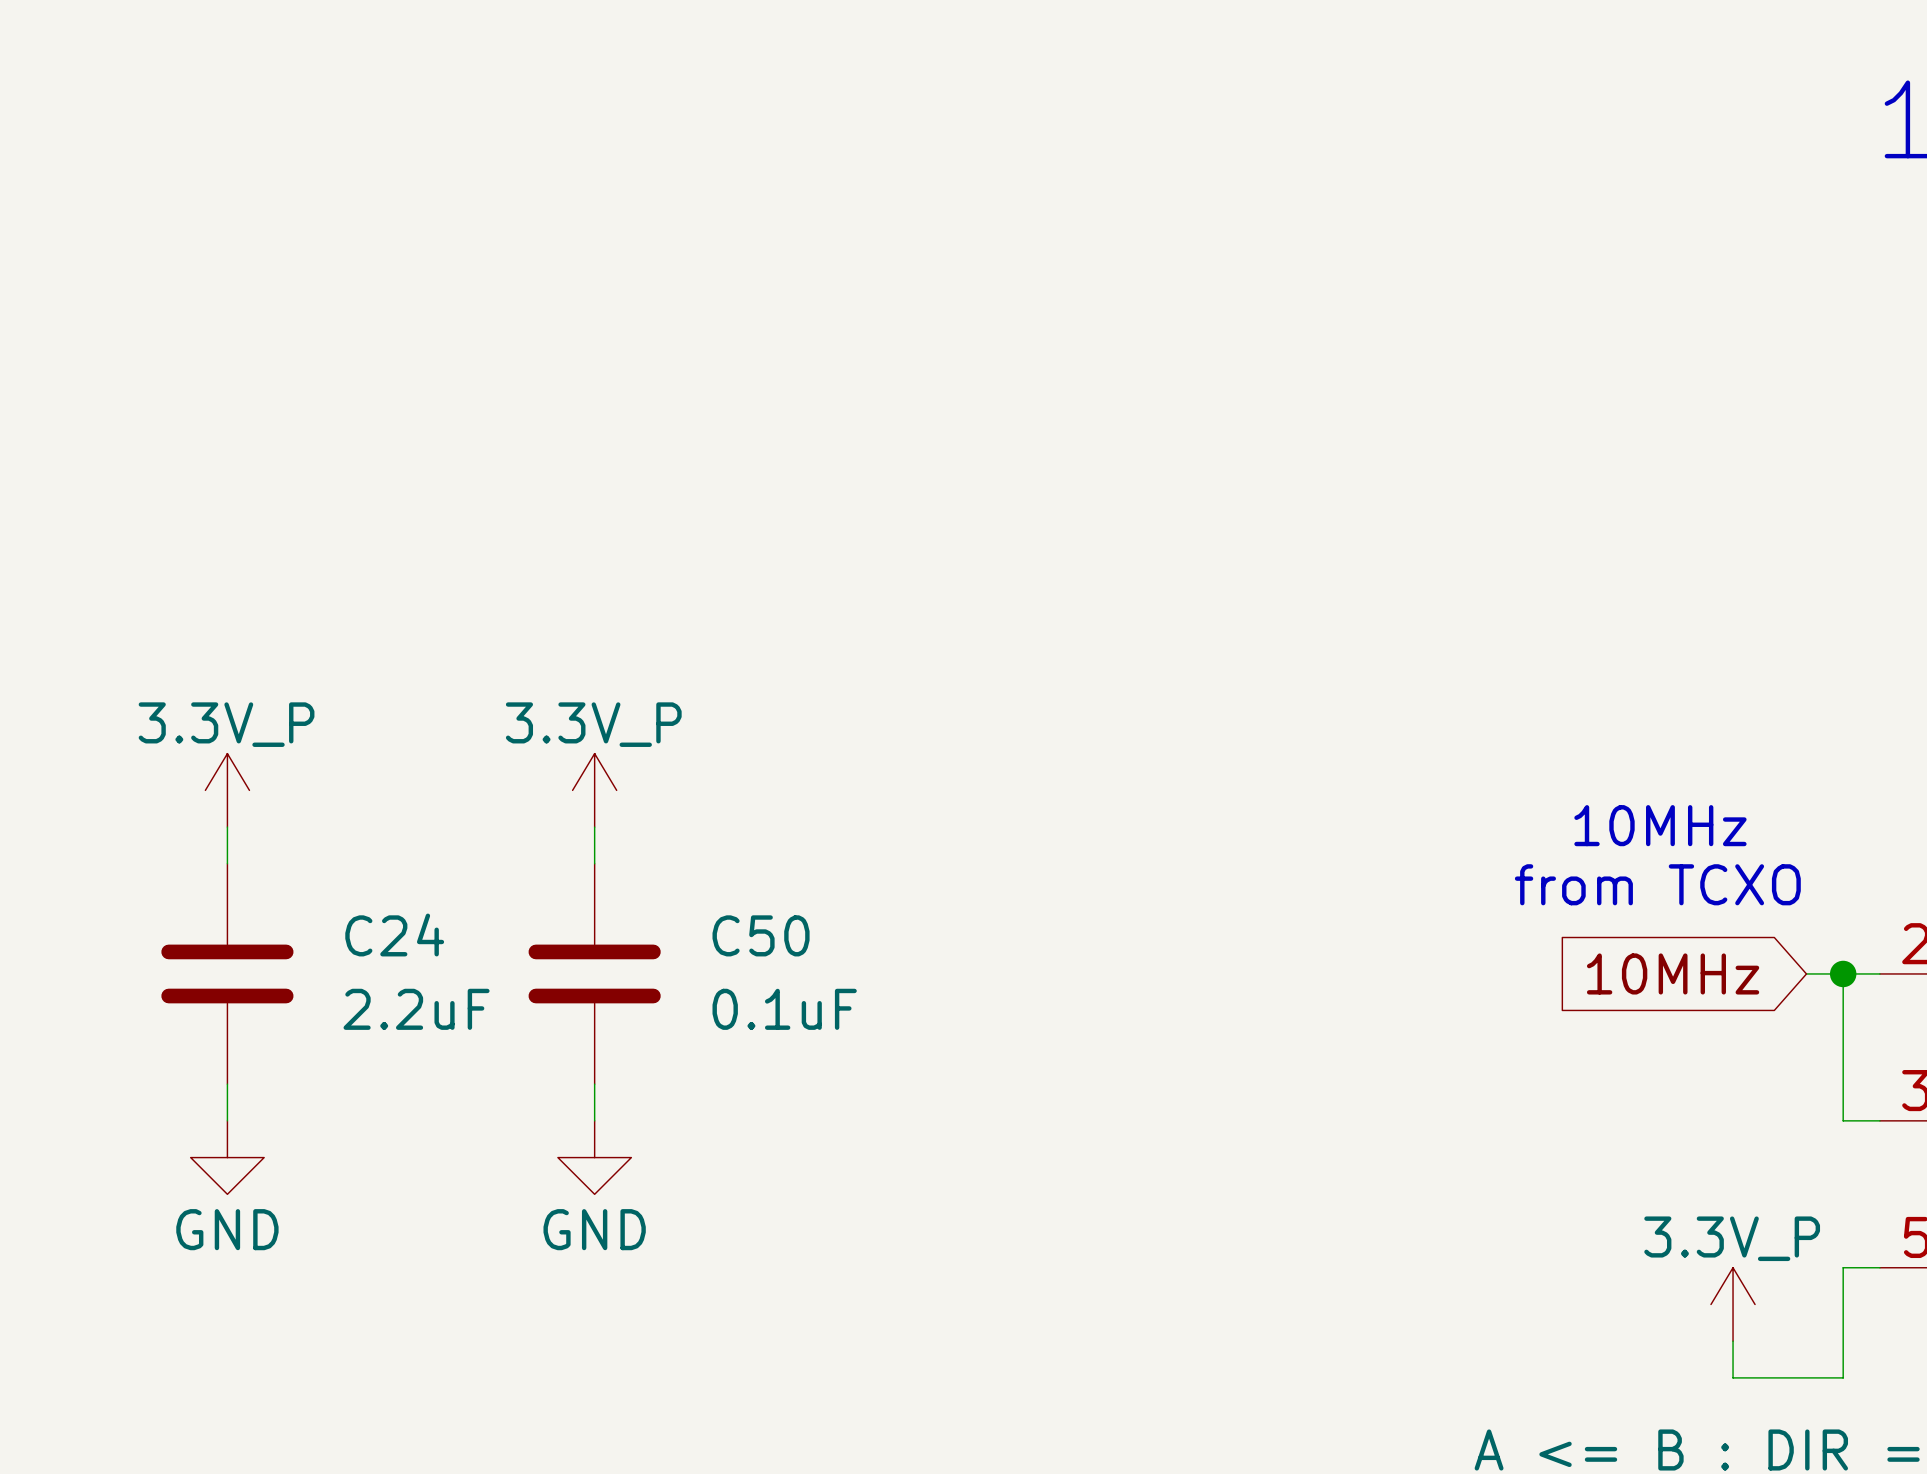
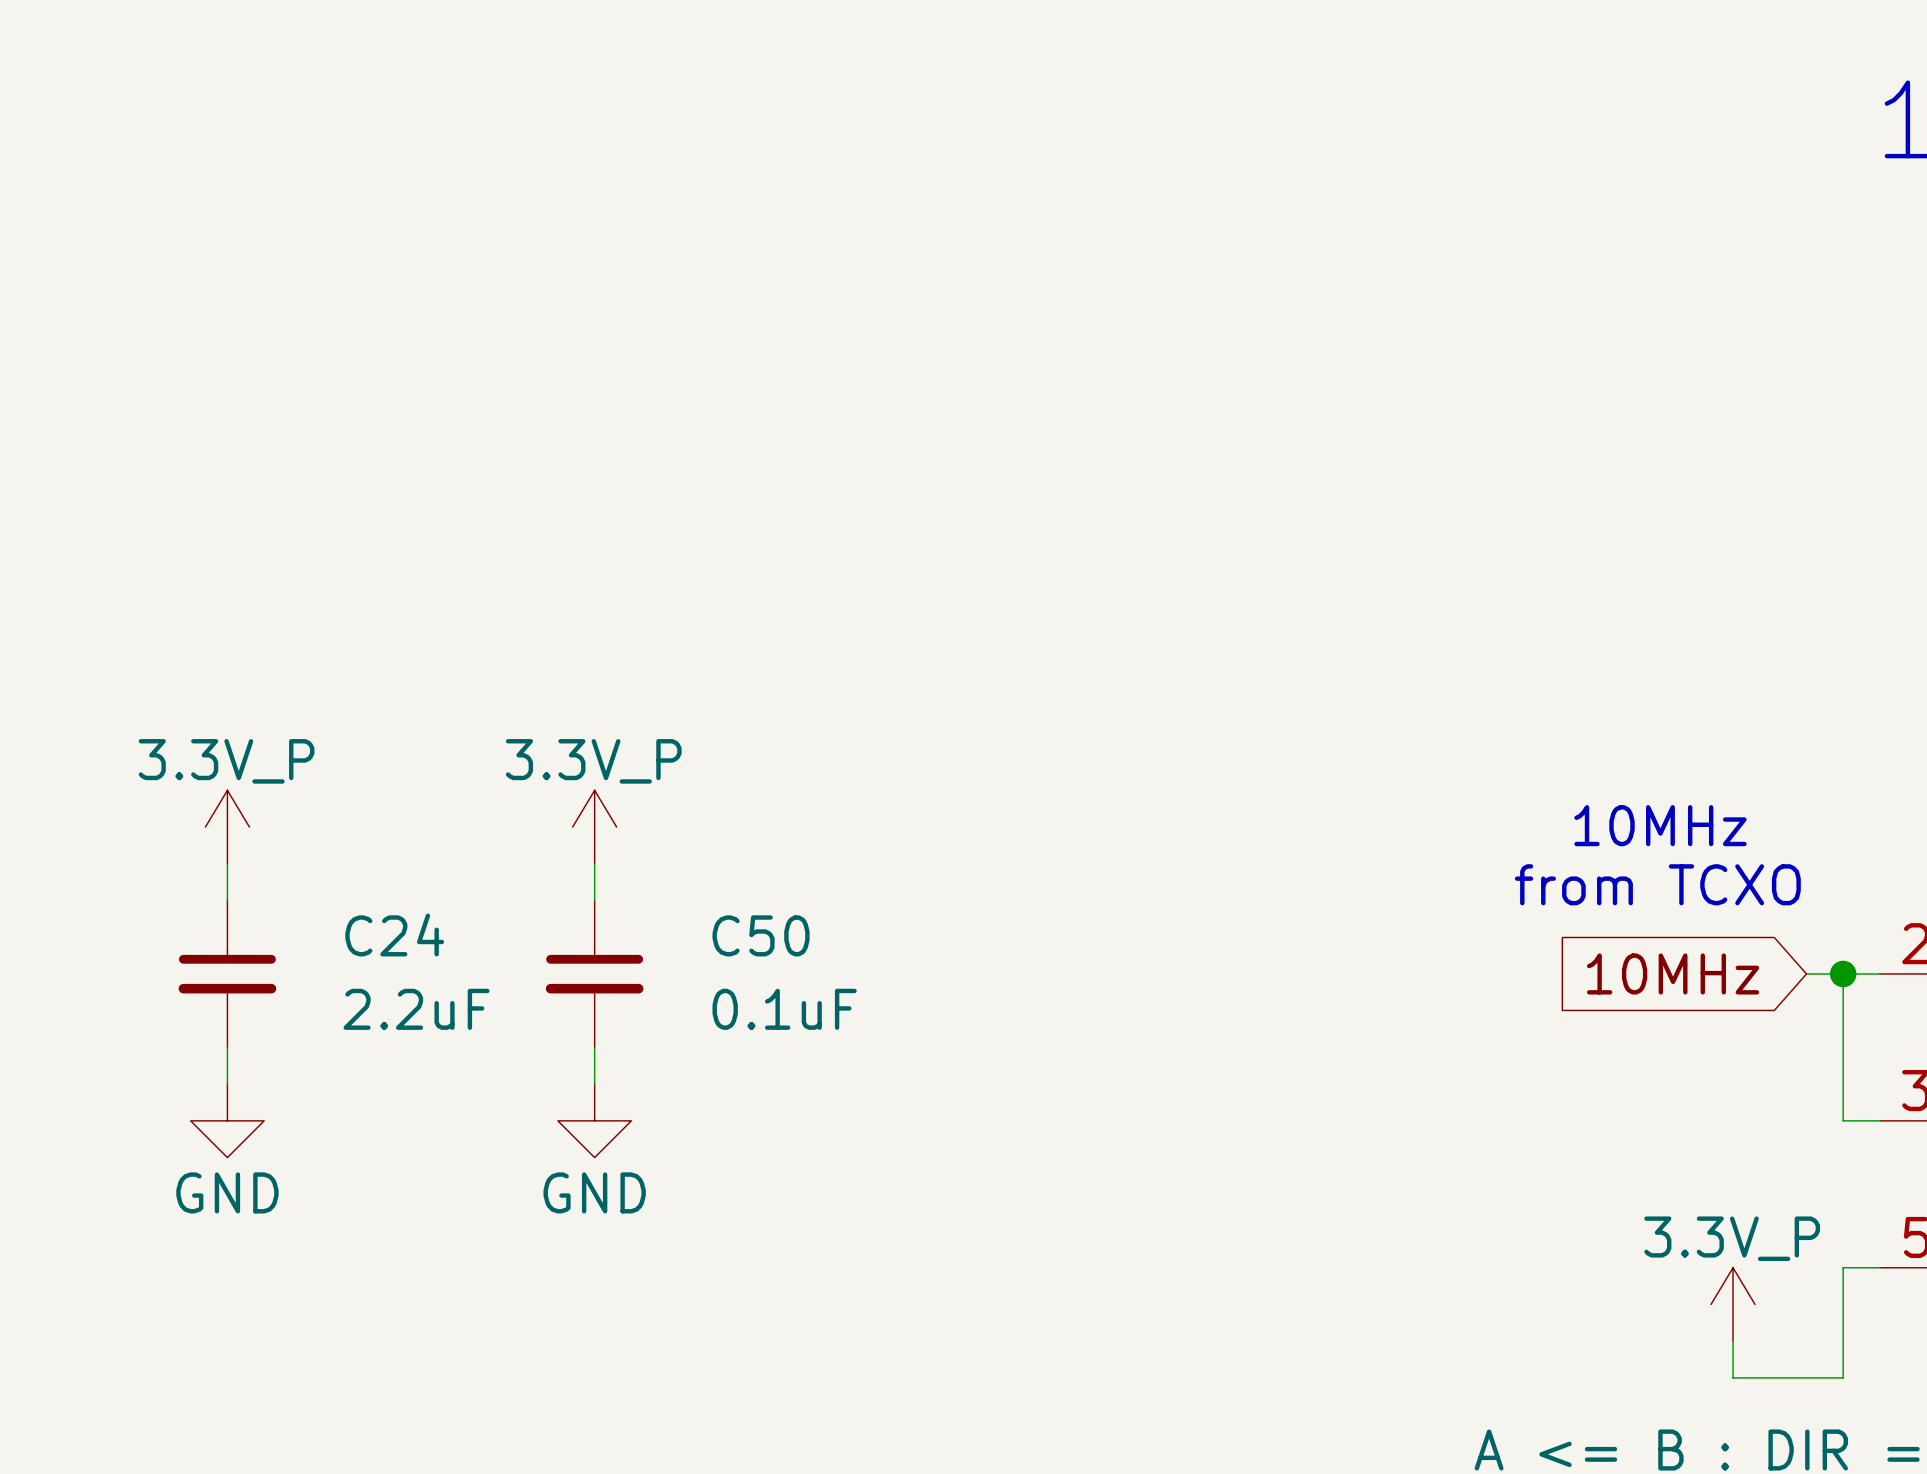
power symbol position: 3.3V_P (227, 790) -> 3.3V_P (227, 827)
power symbol position: 3.3V_P (594, 790) -> 3.3V_P (594, 827)
C24 symbol: [161, 863, 294, 1085] -> [178, 900, 277, 1048]
C50 symbol: [528, 863, 661, 1085] -> [545, 900, 644, 1048]
power symbol position: GND (227, 1157) -> GND (227, 1120)
power symbol position: GND (594, 1157) -> GND (594, 1120)

